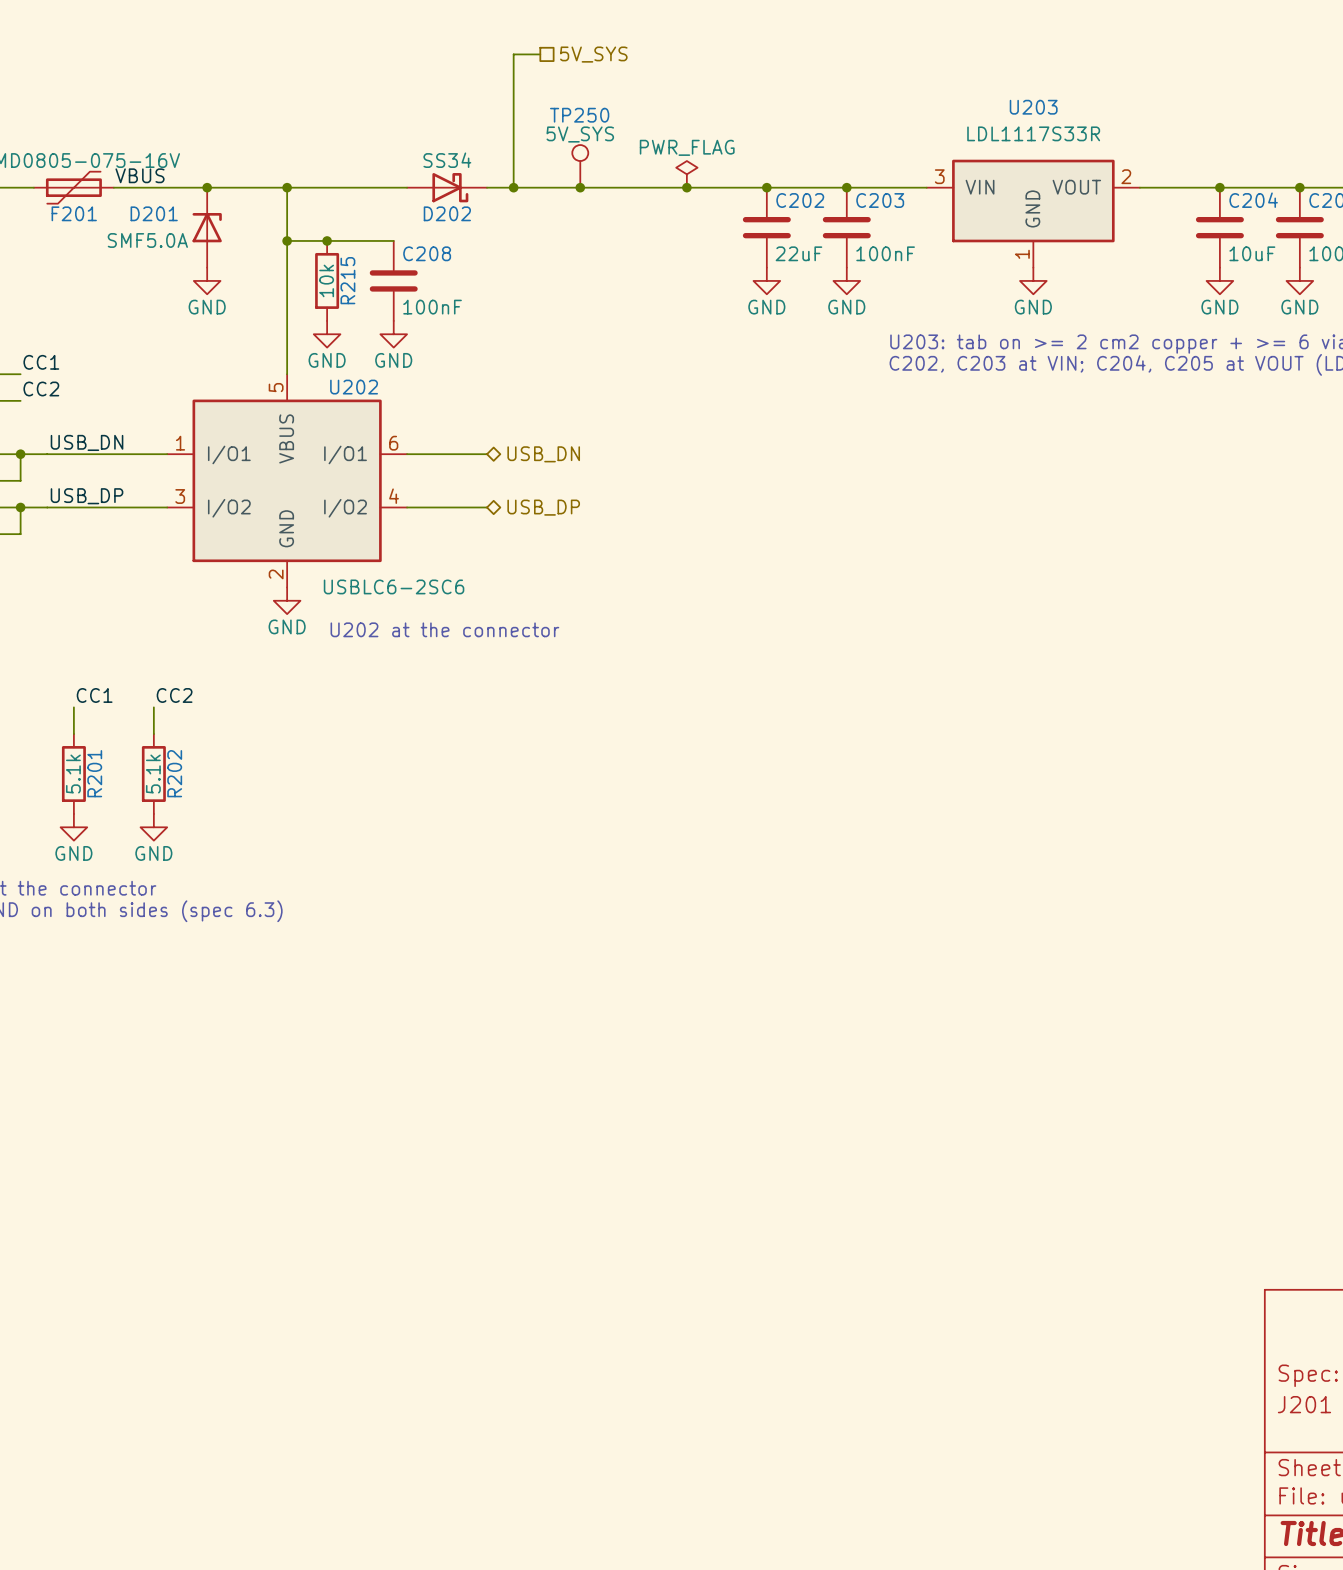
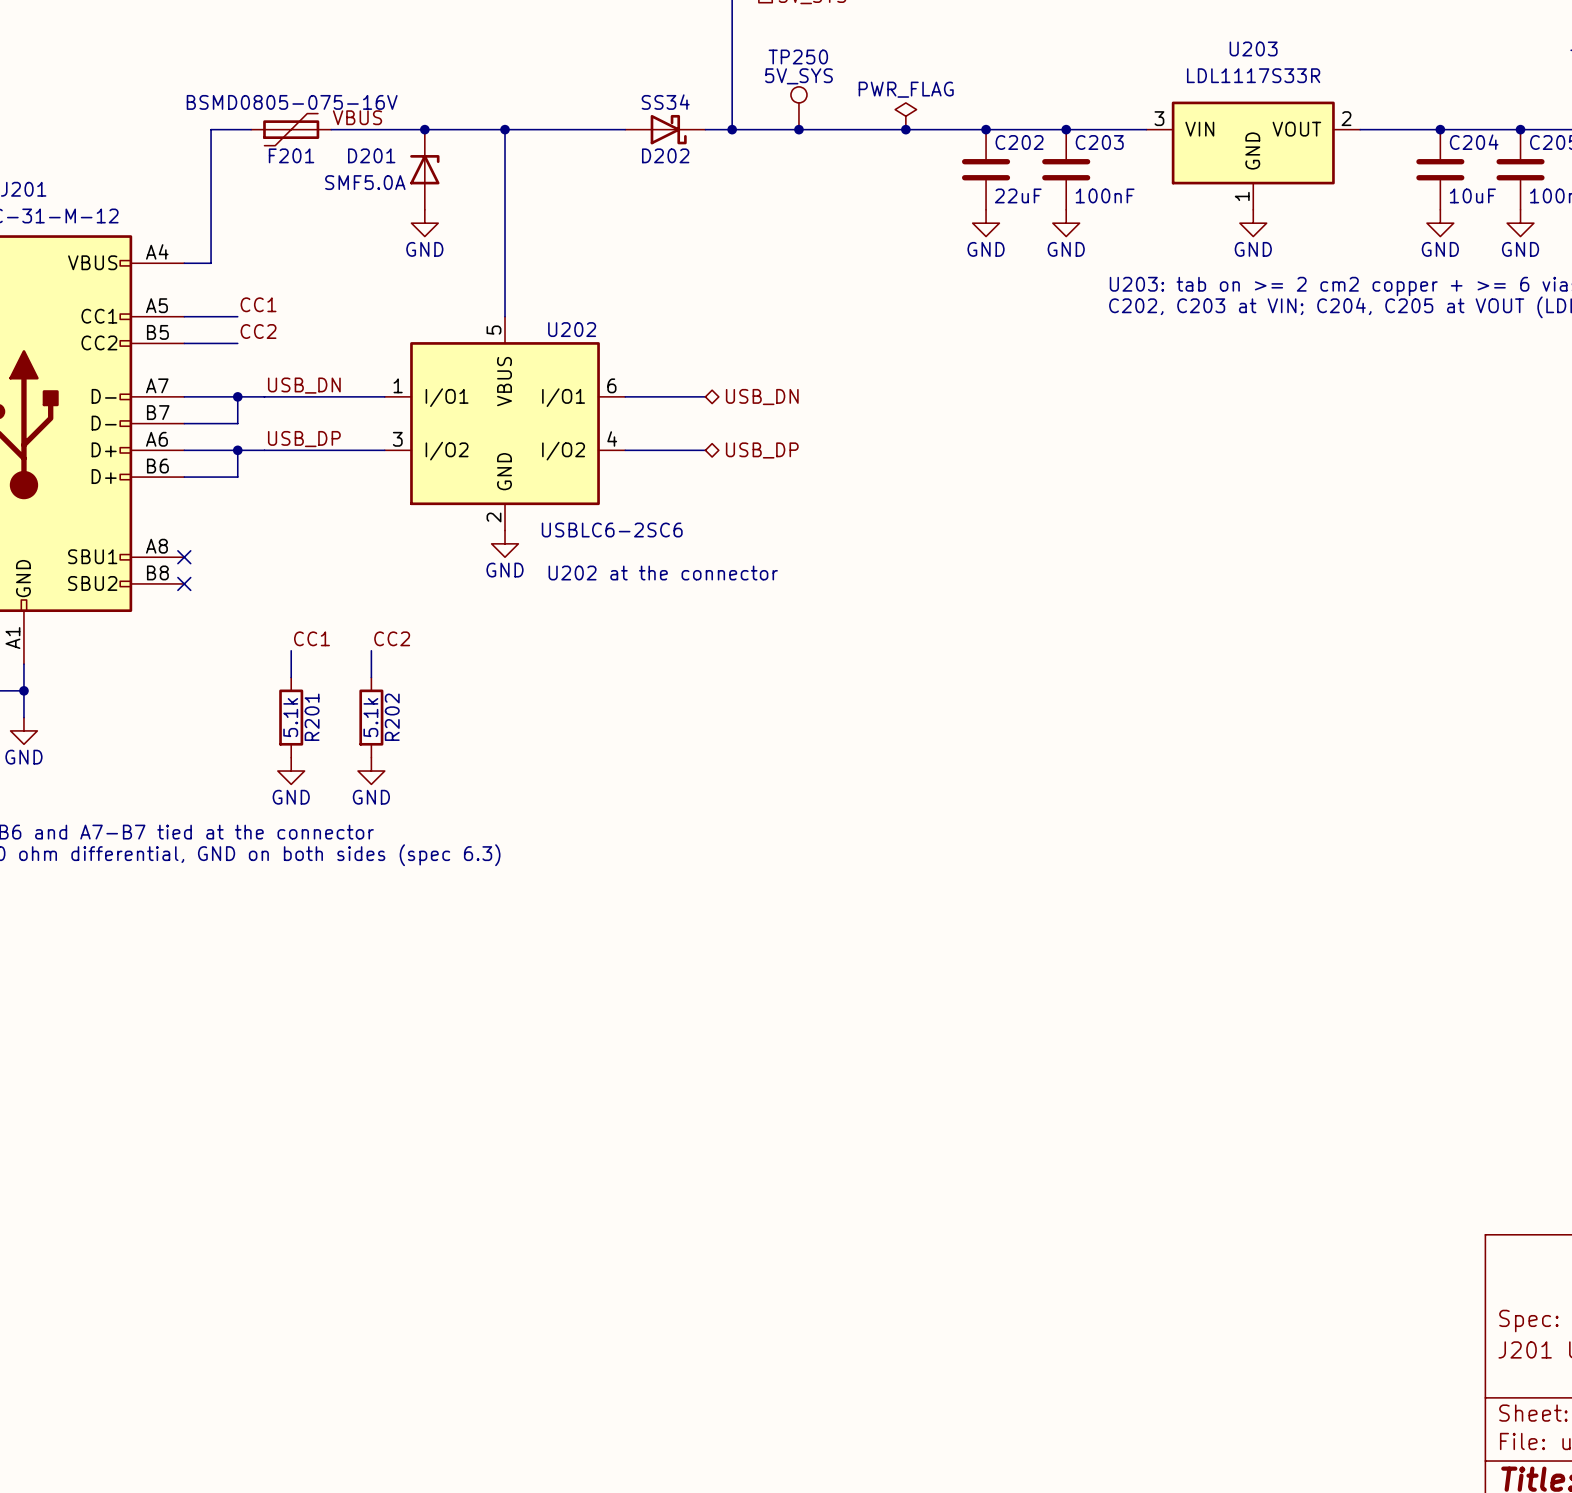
wire: (287, 240) (393, 240) -> none
junction: (287, 240) -> none
junction: (327, 240) -> none
R215: 10k (327, 280) -> none
C208: 100nF (393, 280) -> none
power symbol: GND (327, 334) -> none
power symbol: GND (393, 334) -> none

